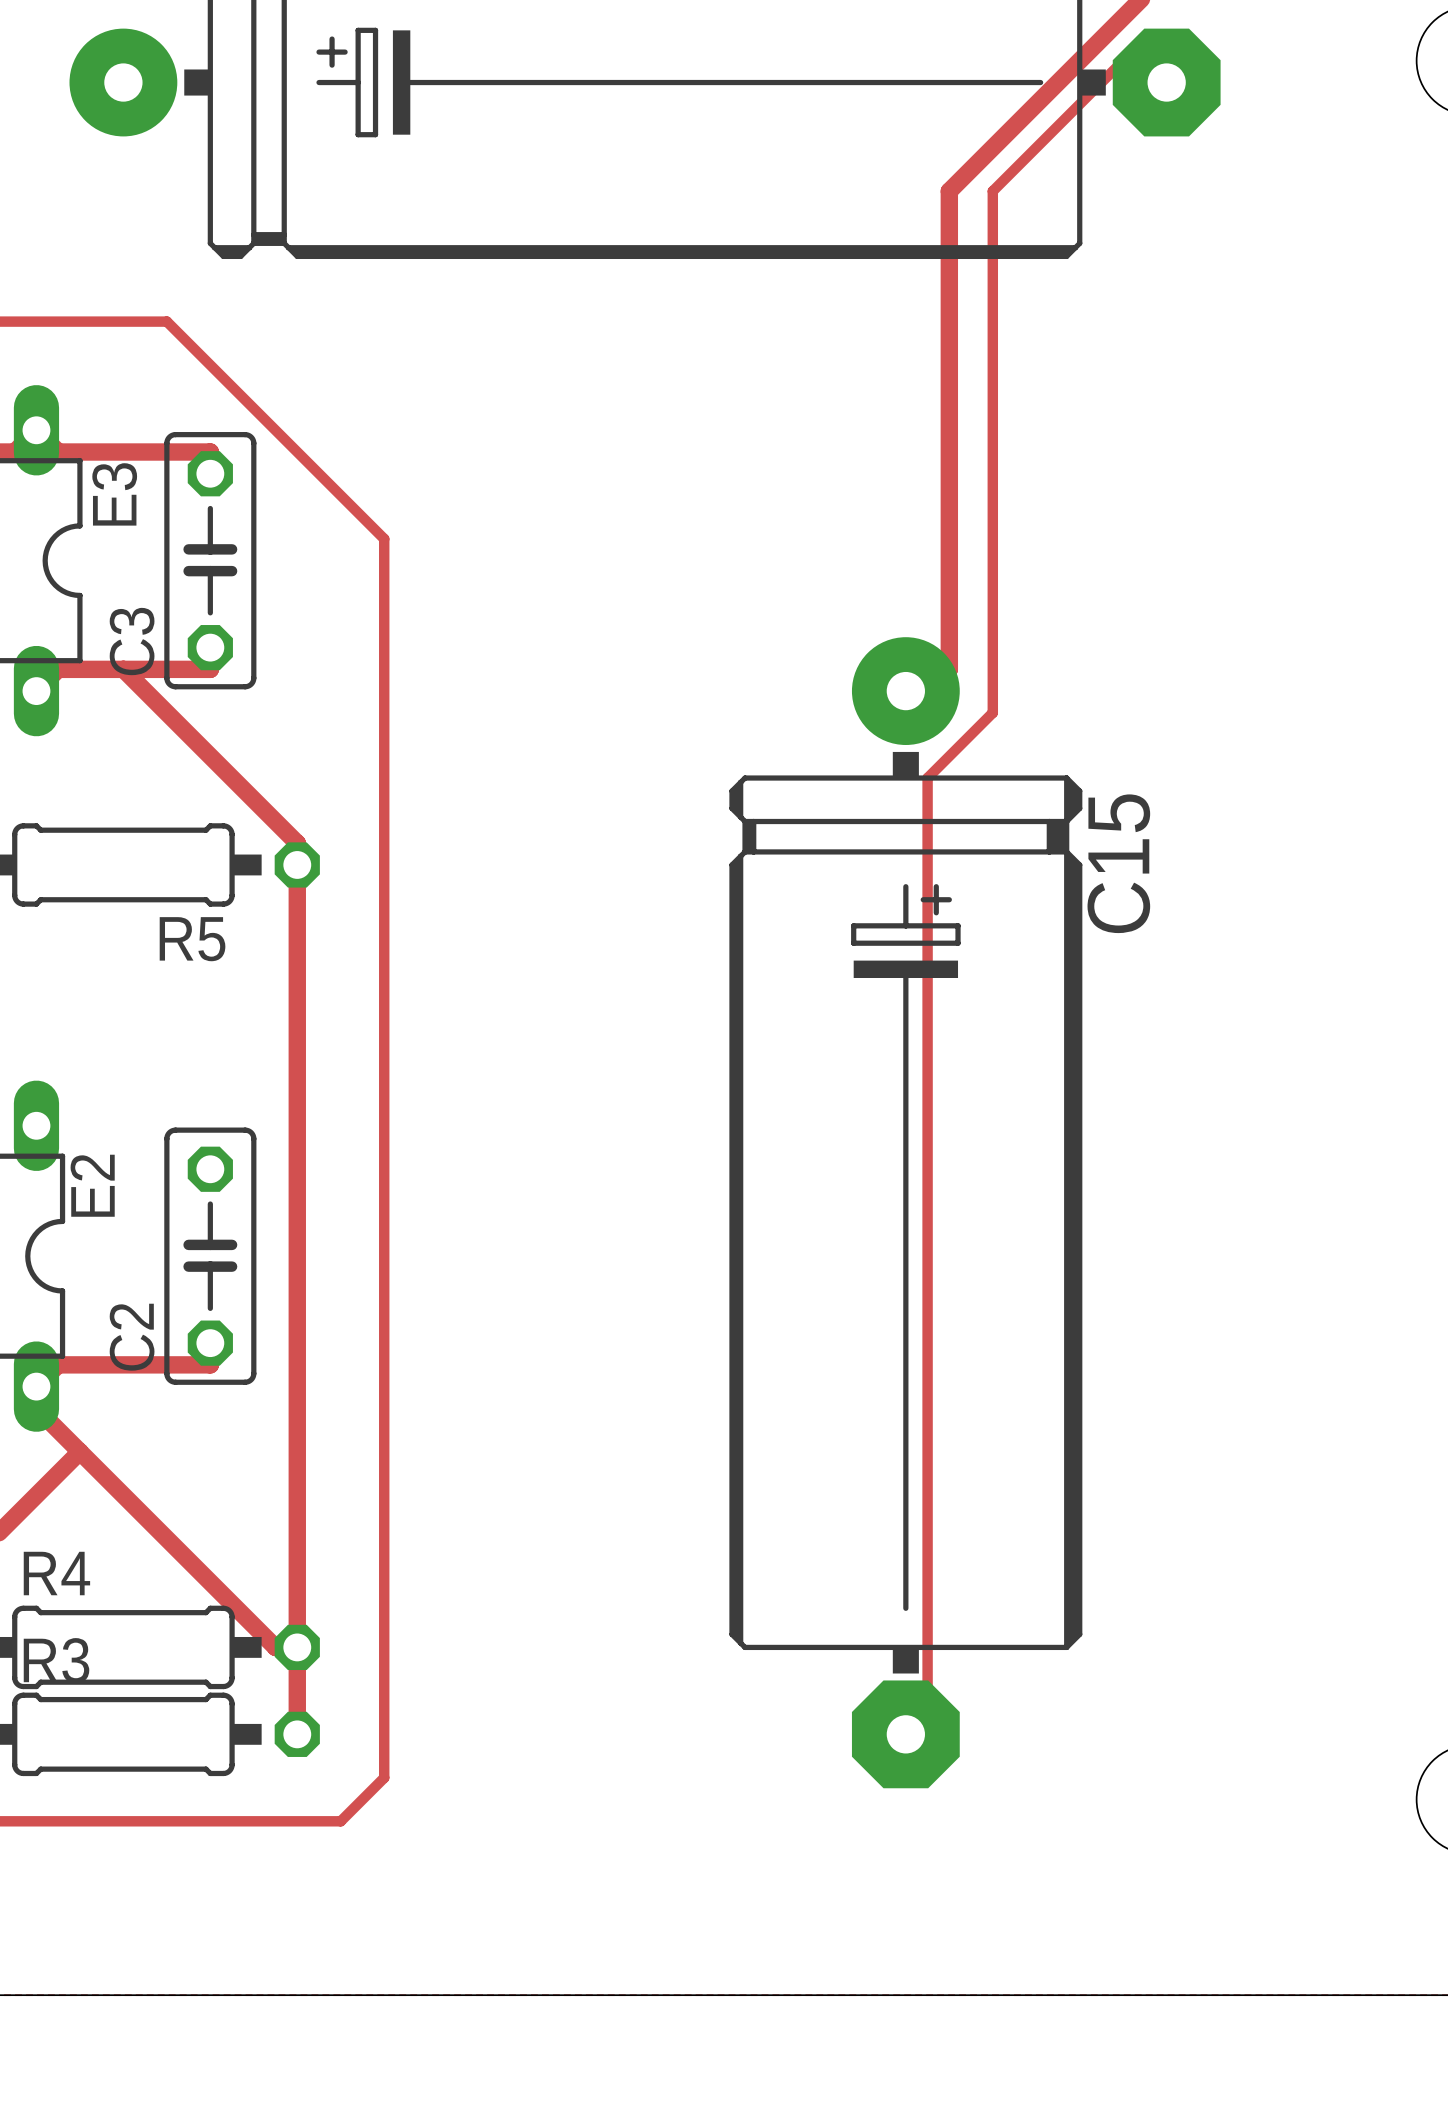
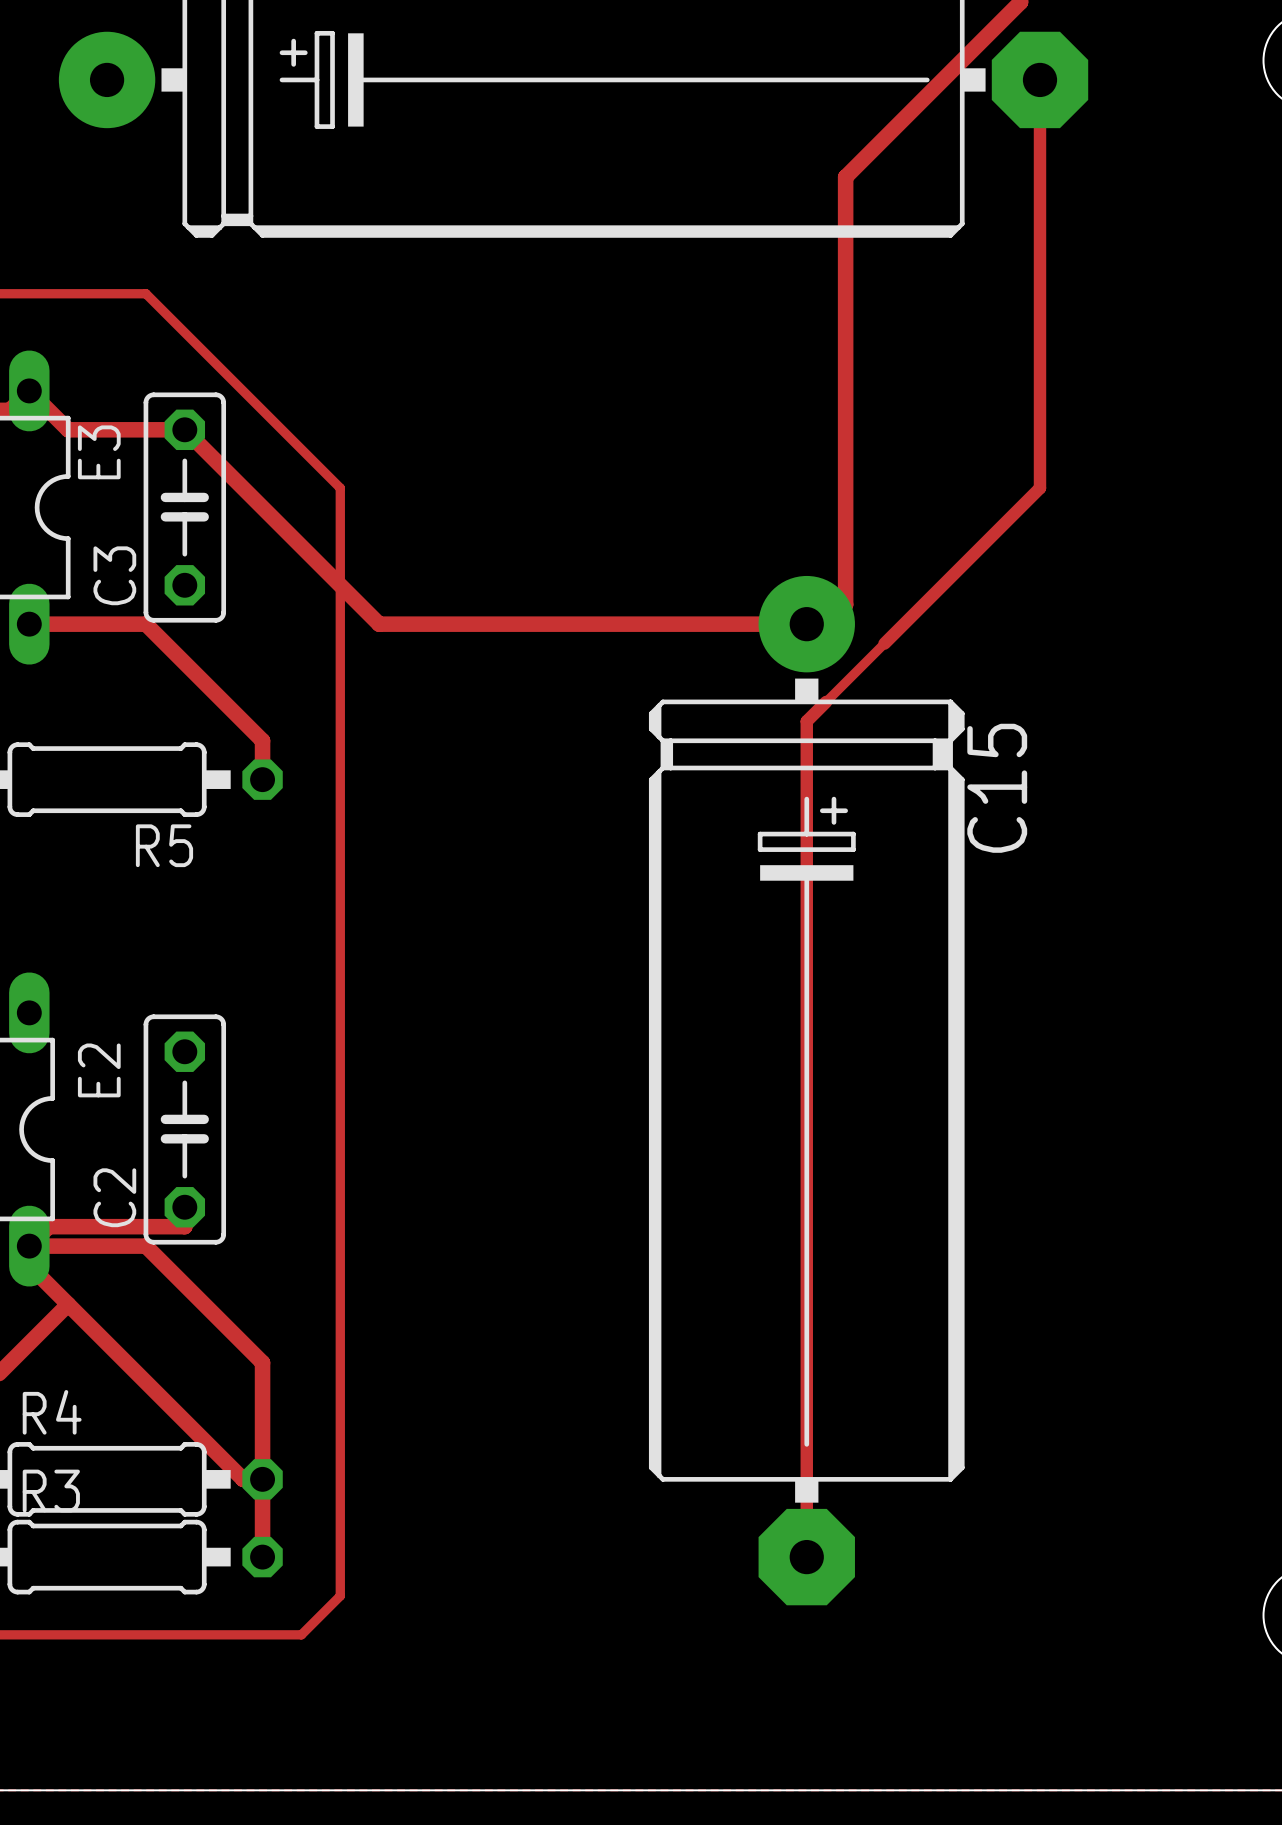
track: (1166, 82) (1123, 60) (992, 191) (992, 712) -> (1040, 79) (1040, 488) (884, 643)
track: (58, 452) (210, 452) (210, 473) -> (48, 410) (68, 429) (184, 429) (379, 624) (806, 624)
track: (210, 647) (210, 669) (58, 669) (36, 691) -> none
track: (123, 669) (297, 843) -> (29, 624) (145, 624) (262, 740) (262, 760)
track: (927, 778) (927, 1690) (905, 1734) -> (826, 701) (806, 721) (806, 1557)
track: (297, 864) (297, 1517) -> (29, 1246) (145, 1246) (262, 1362)
E2 name position: E2 (92, 1185) -> E2 (99, 1070)

